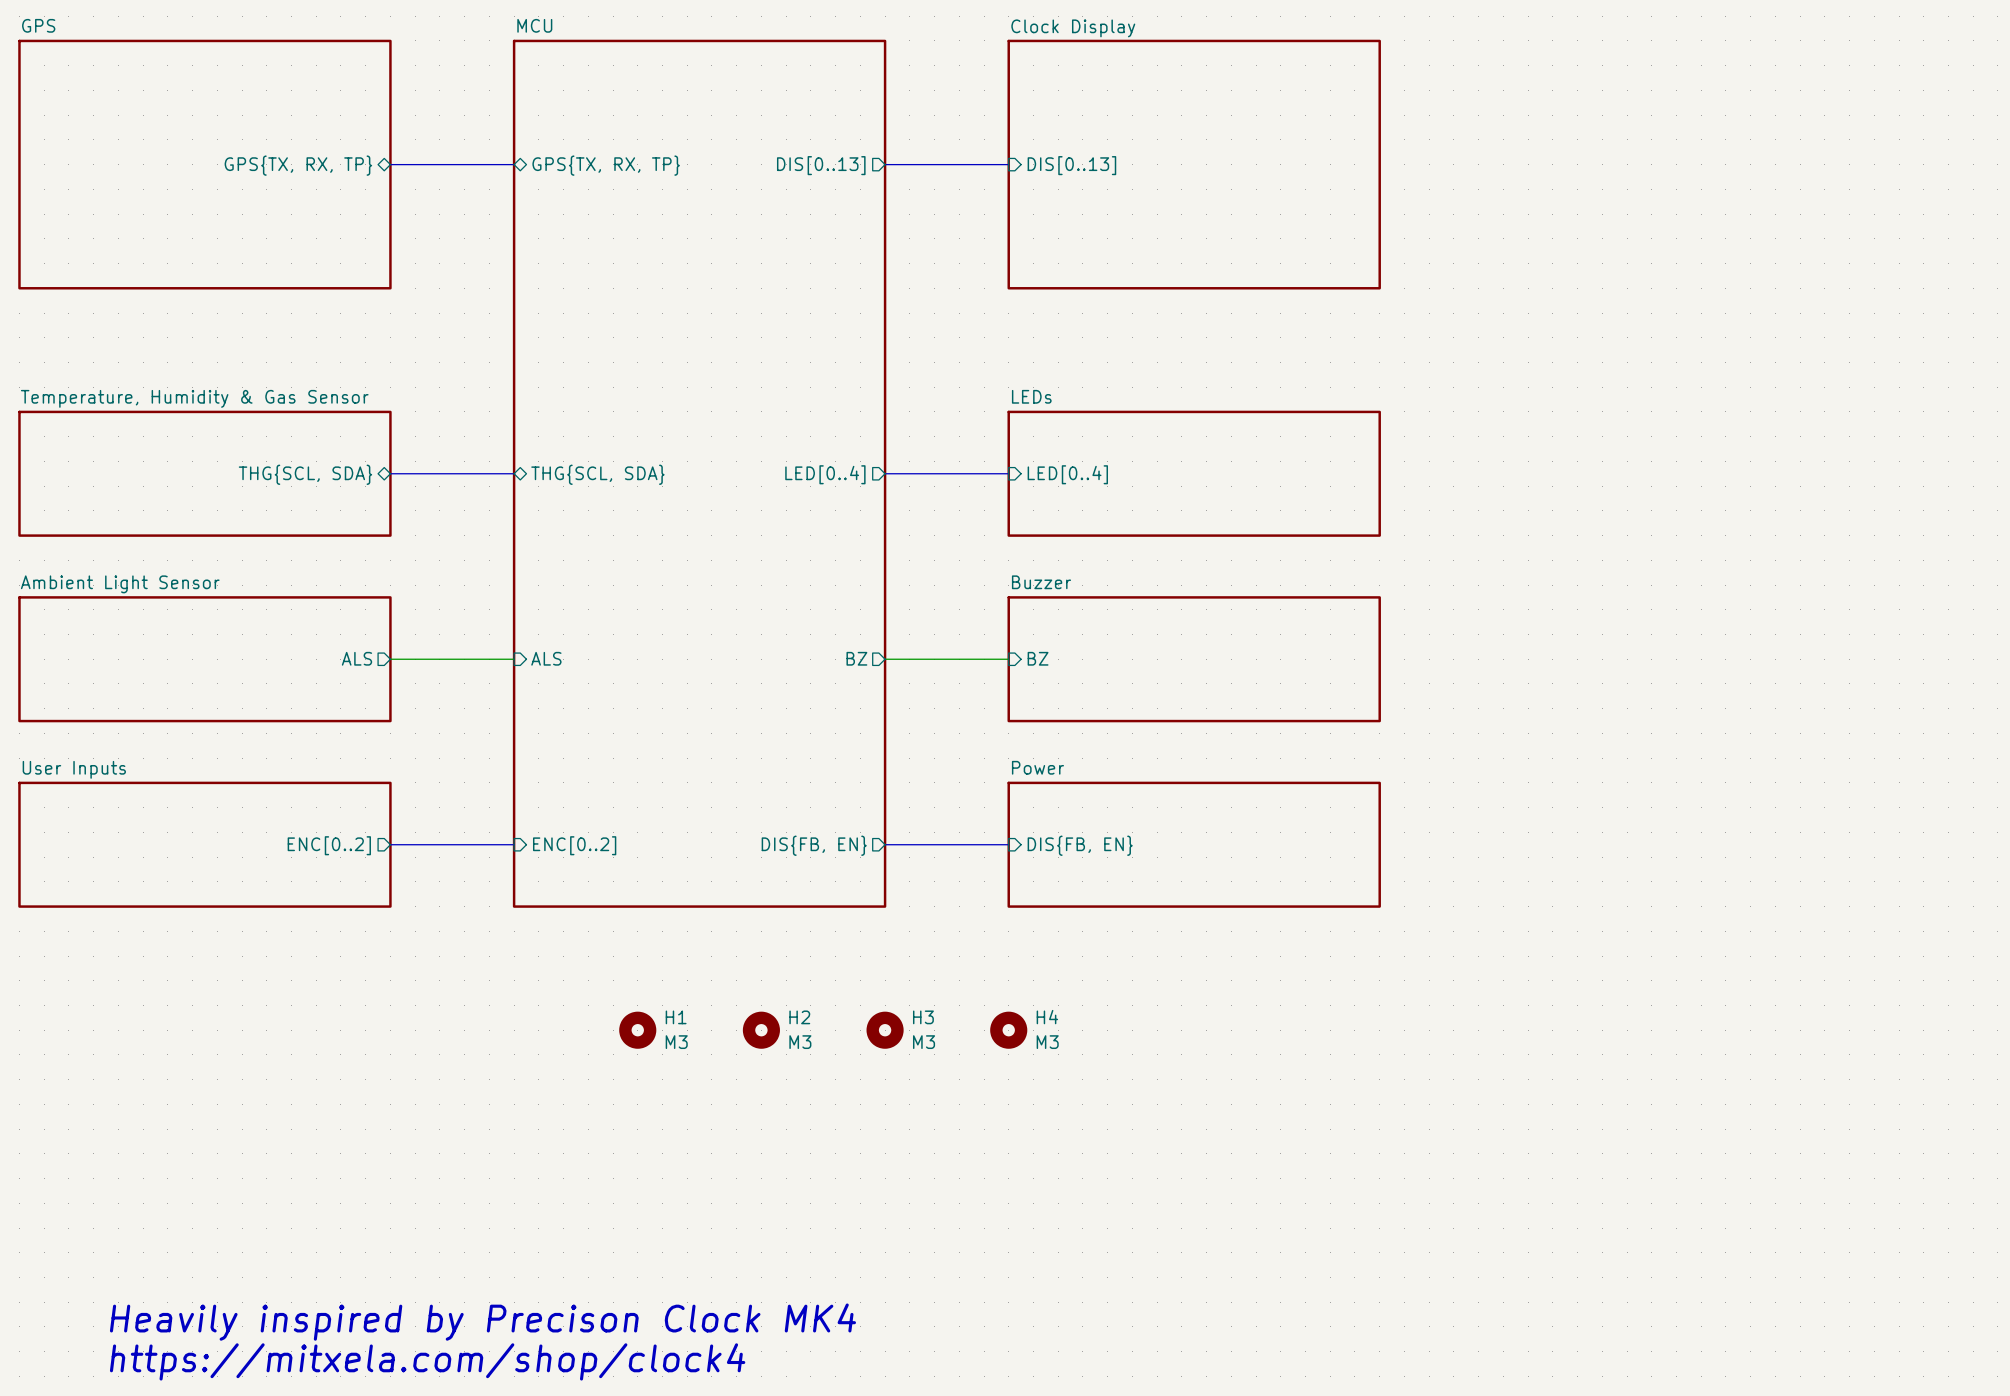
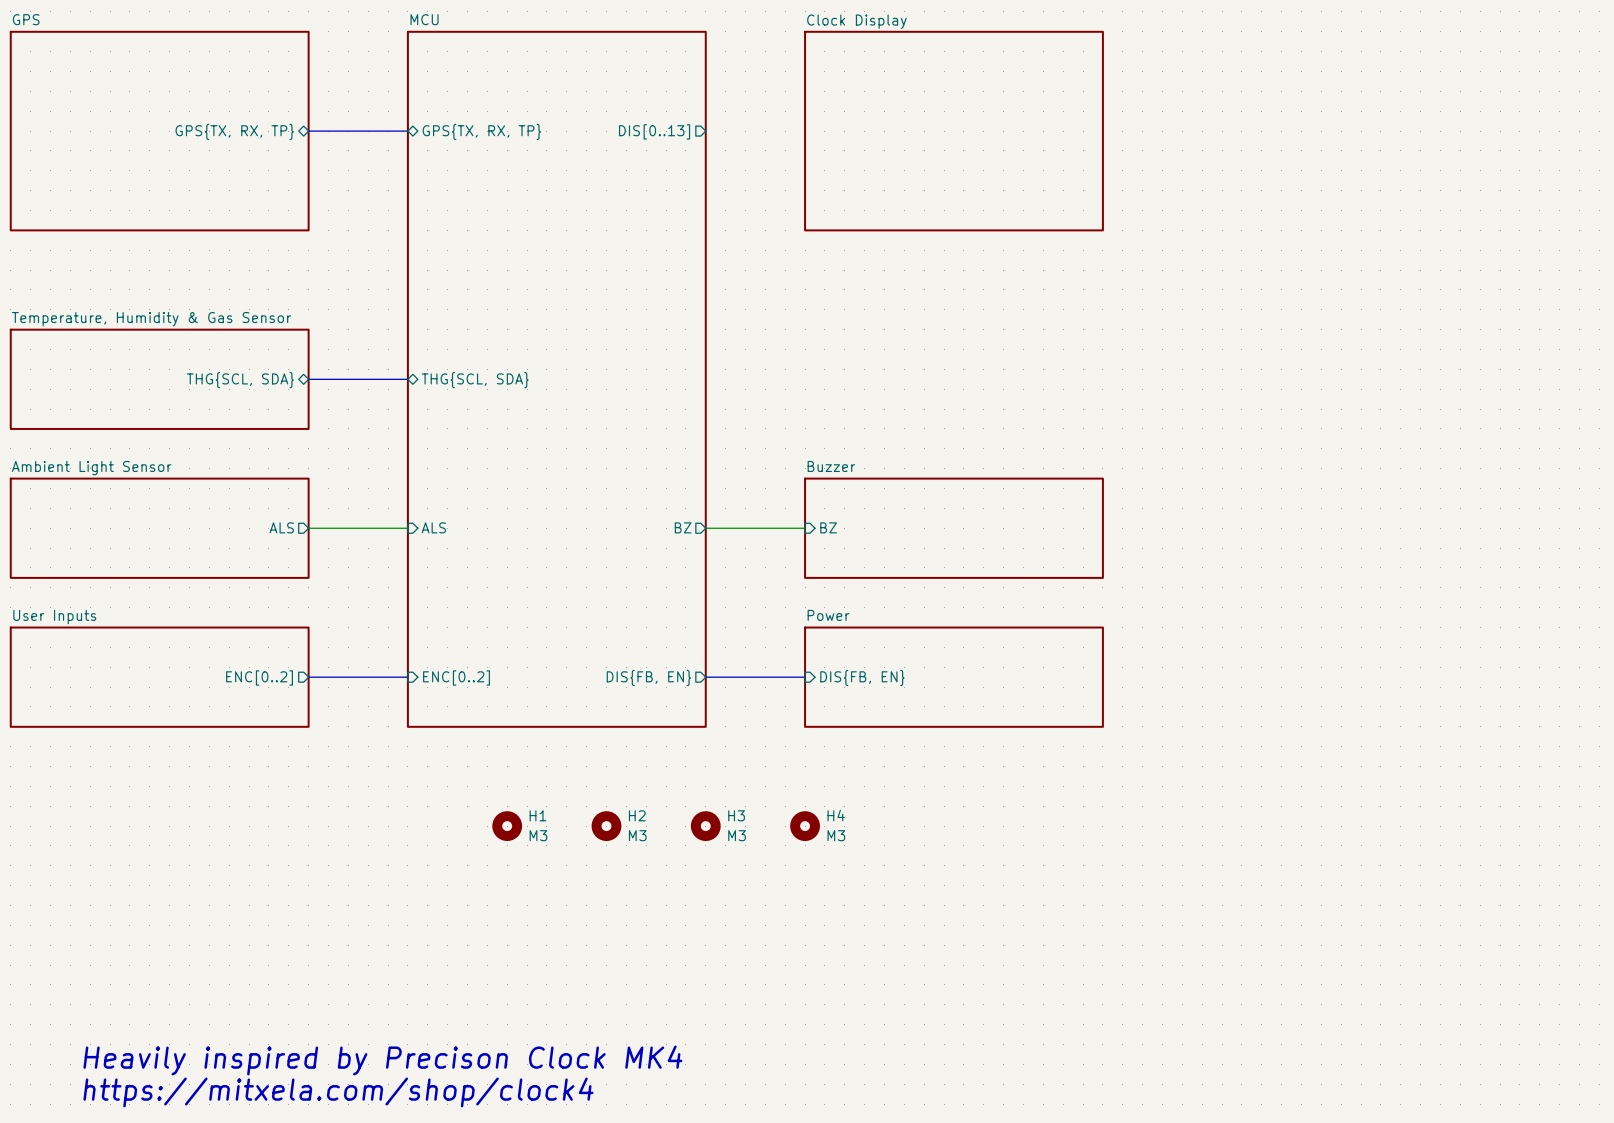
bus: (885, 164) (1008, 164) -> none
sheet pin: DIS[0..13] (1071, 165) -> none
bus: (885, 473) (1008, 473) -> none
sheet LEDs: (1194, 473) -> none
sheet pin: LED[0..4] (825, 474) -> none
sheet pin: LED[0..4] (1067, 474) -> none

